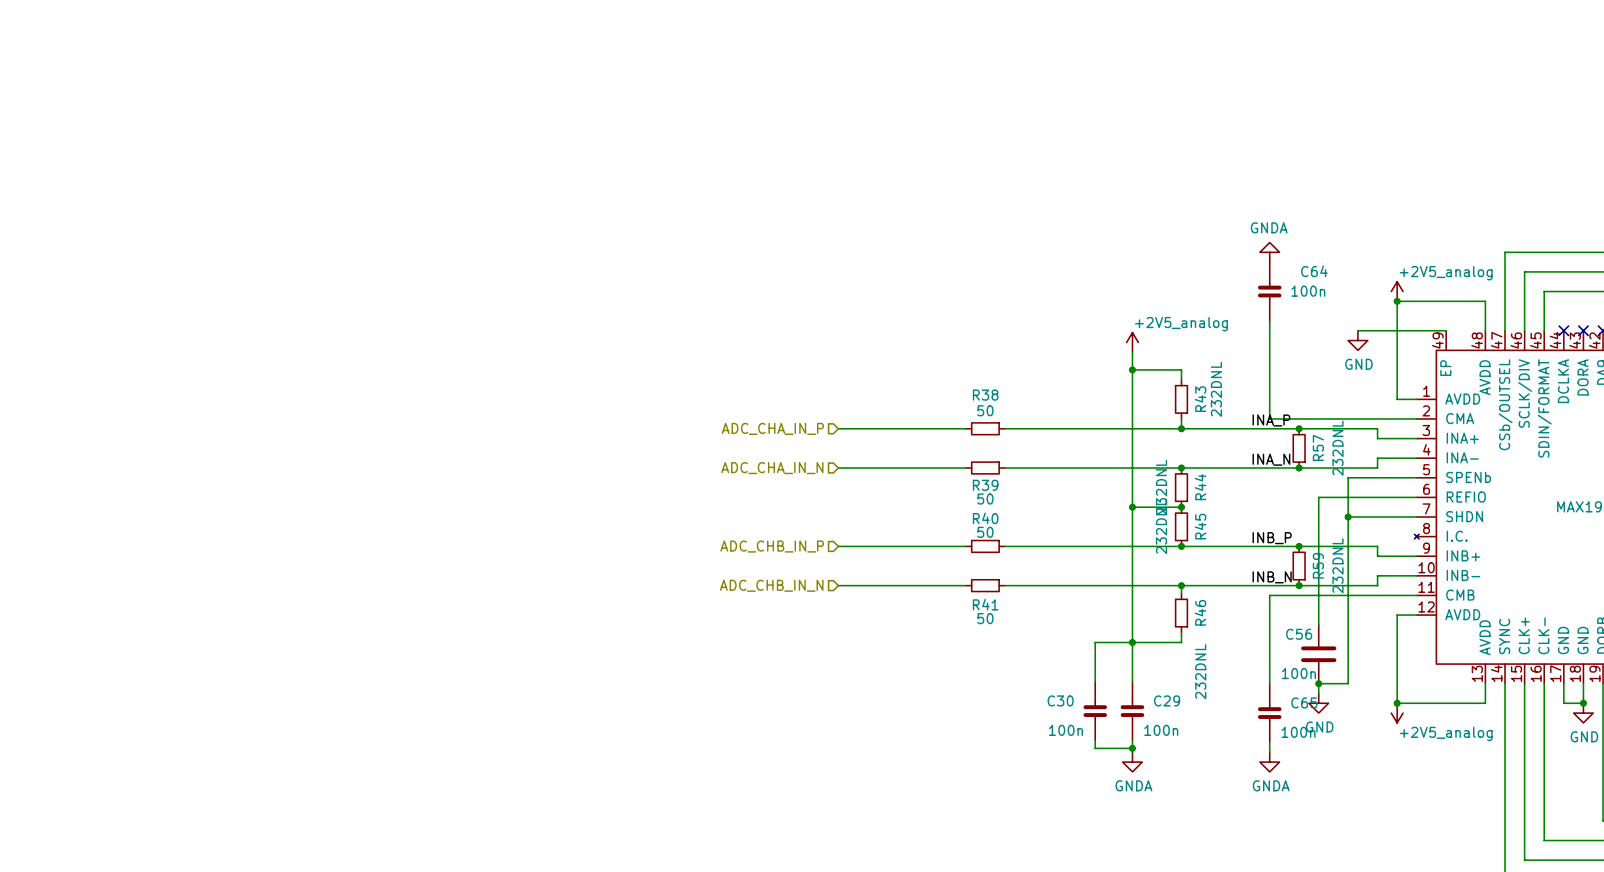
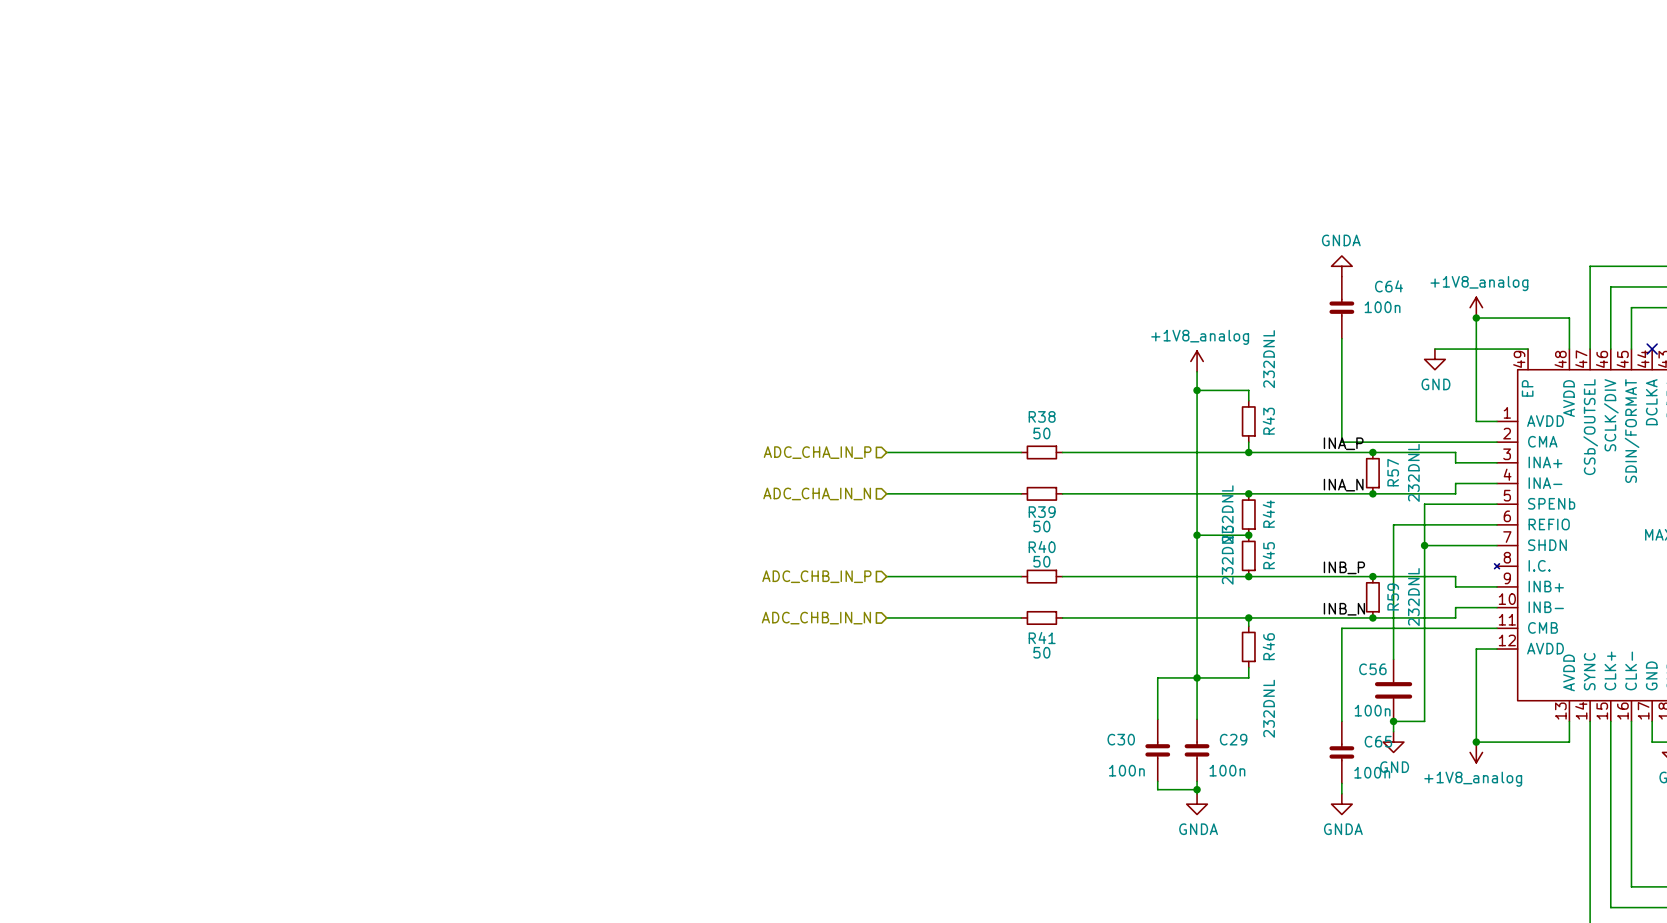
power symbol: +2V5_analog (1397, 291) -> +1V8_analog (1476, 307)
power symbol: +2V5_analog (1132, 342) -> +1V8_analog (1197, 361)
R43 value position: 232DNL (1216, 389) -> 232DNL (1269, 359)
power symbol: +2V5_analog (1397, 713) -> +1V8_analog (1476, 752)

